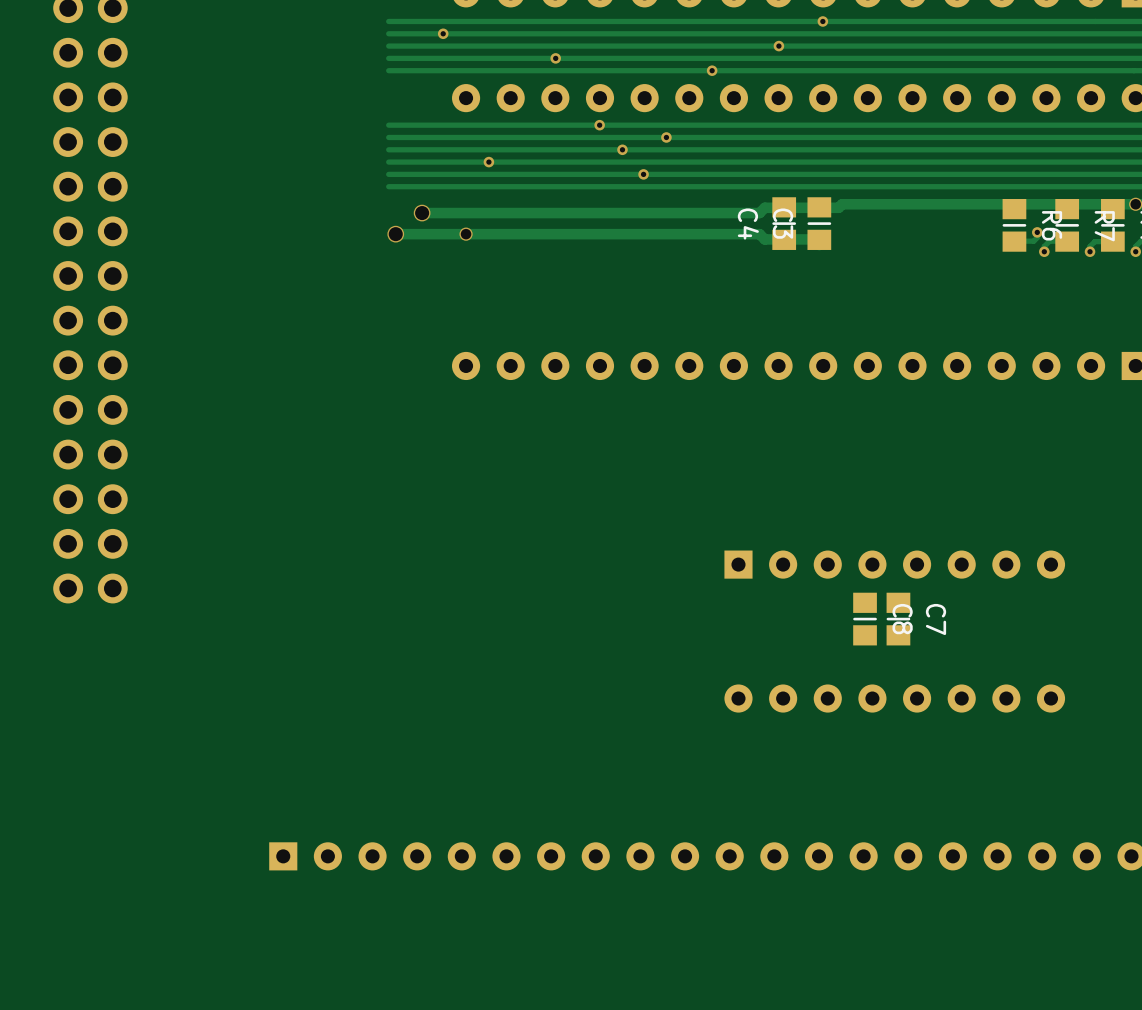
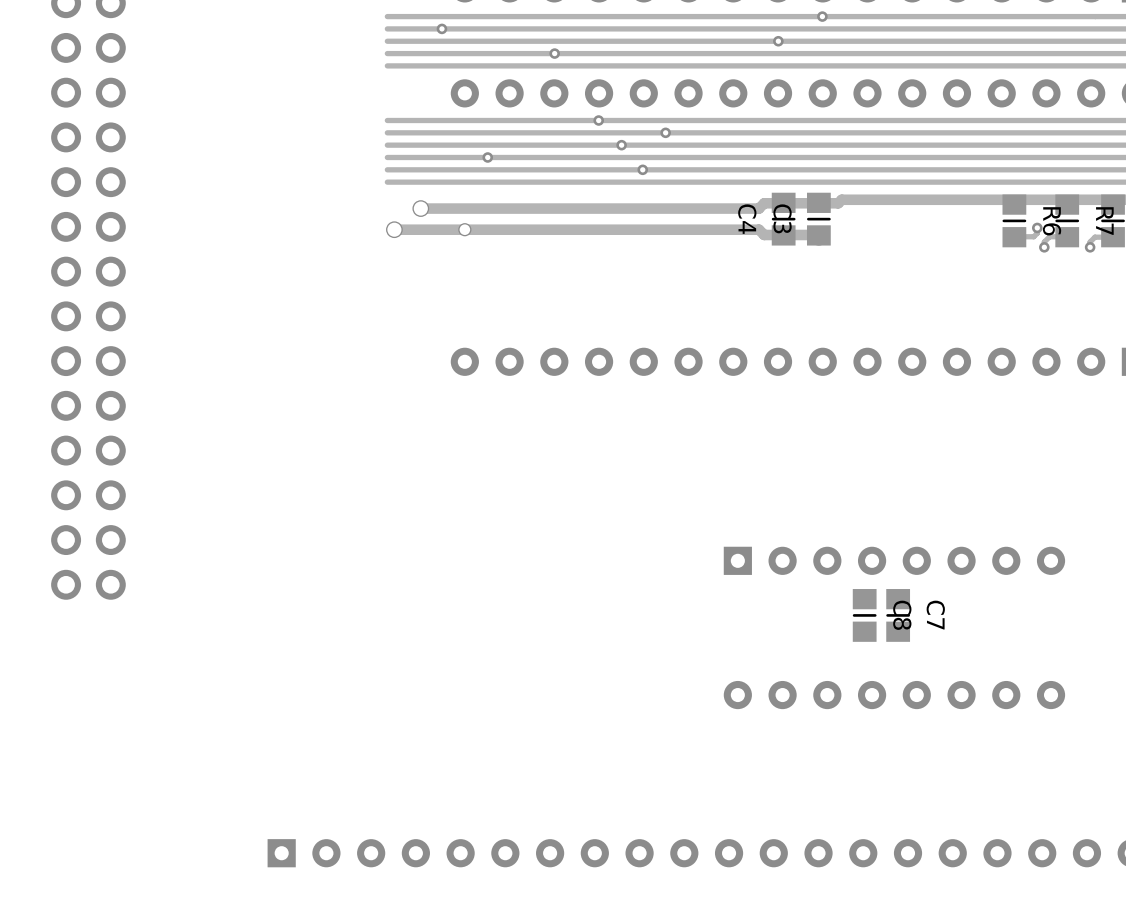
via: (712, 70) -> none

